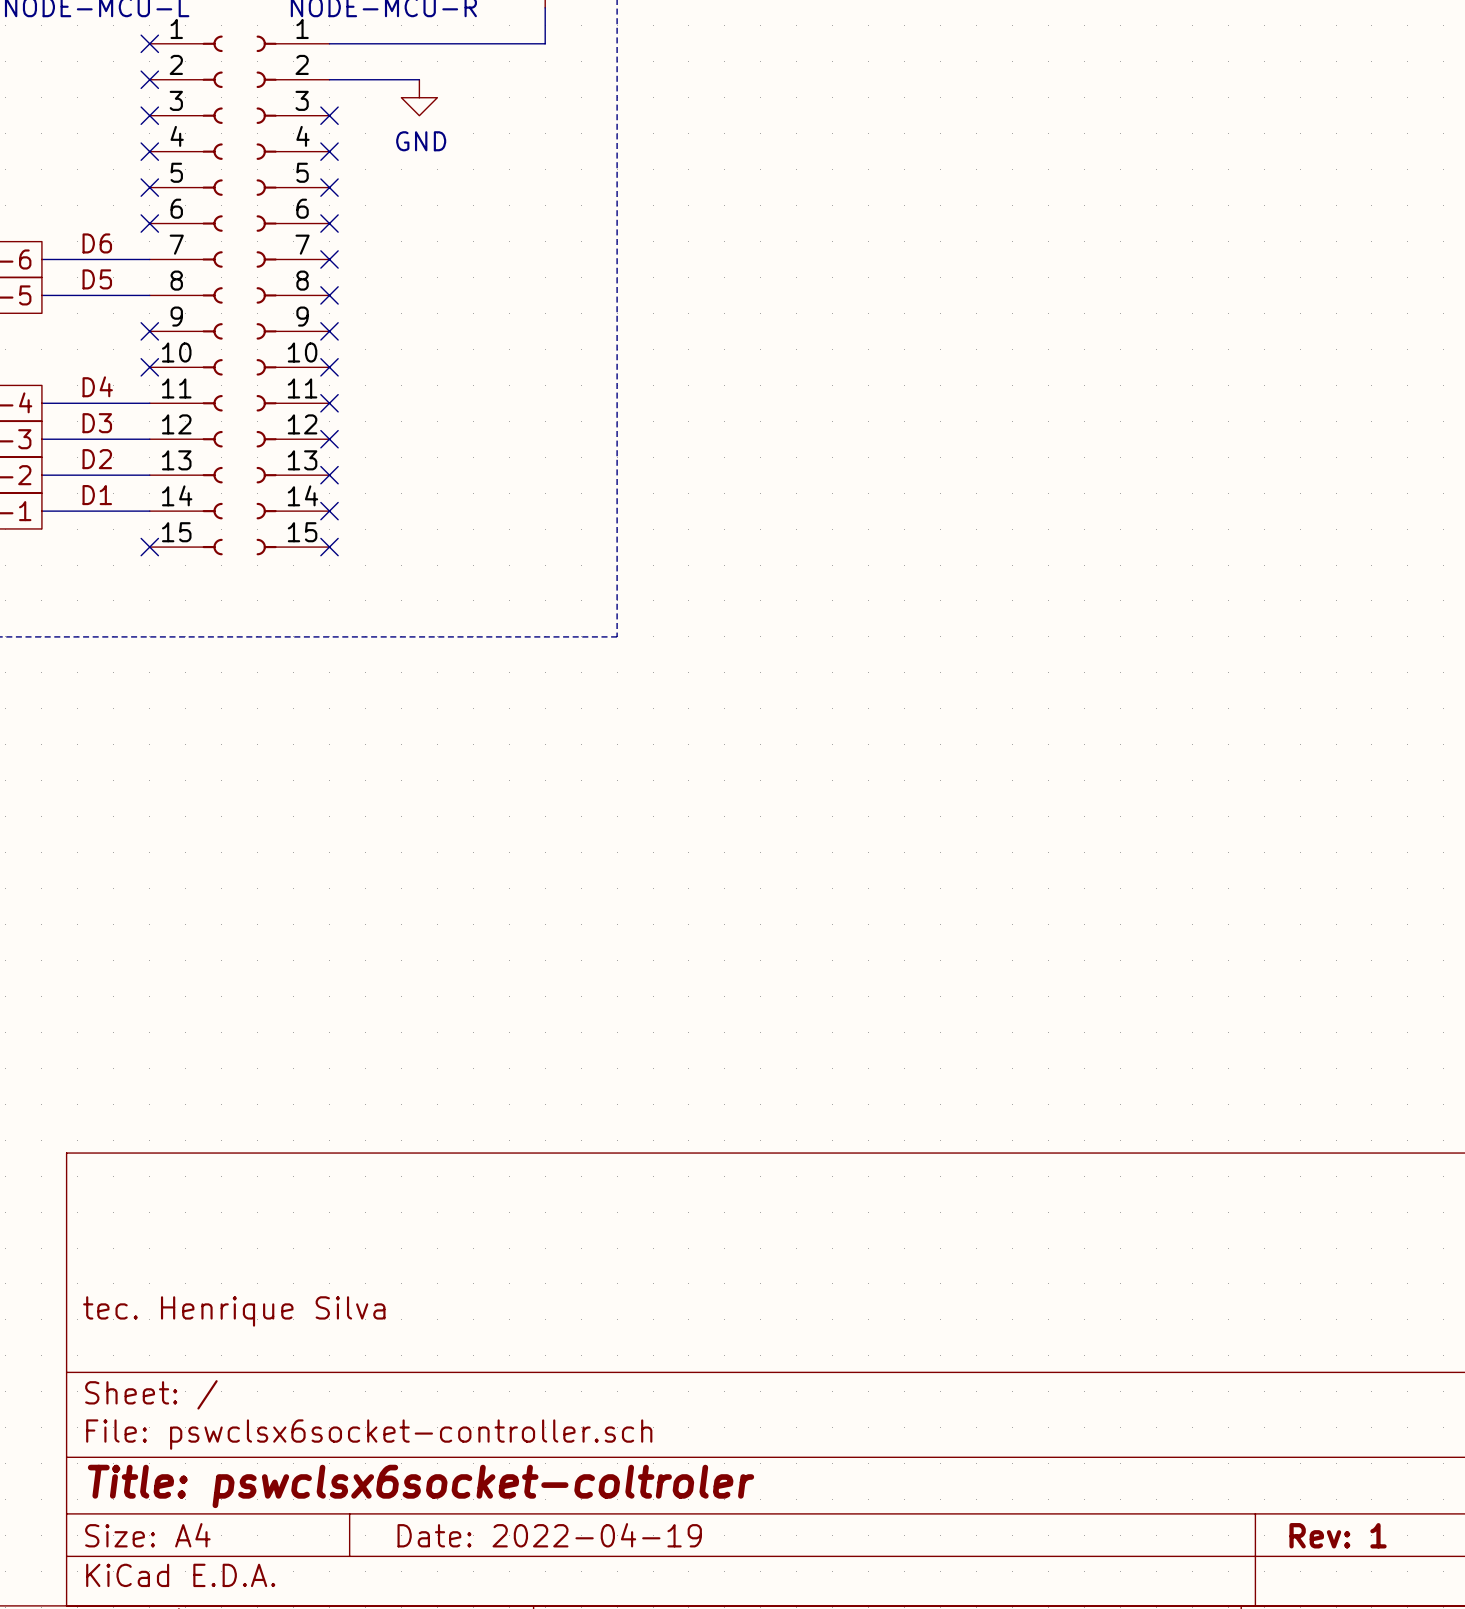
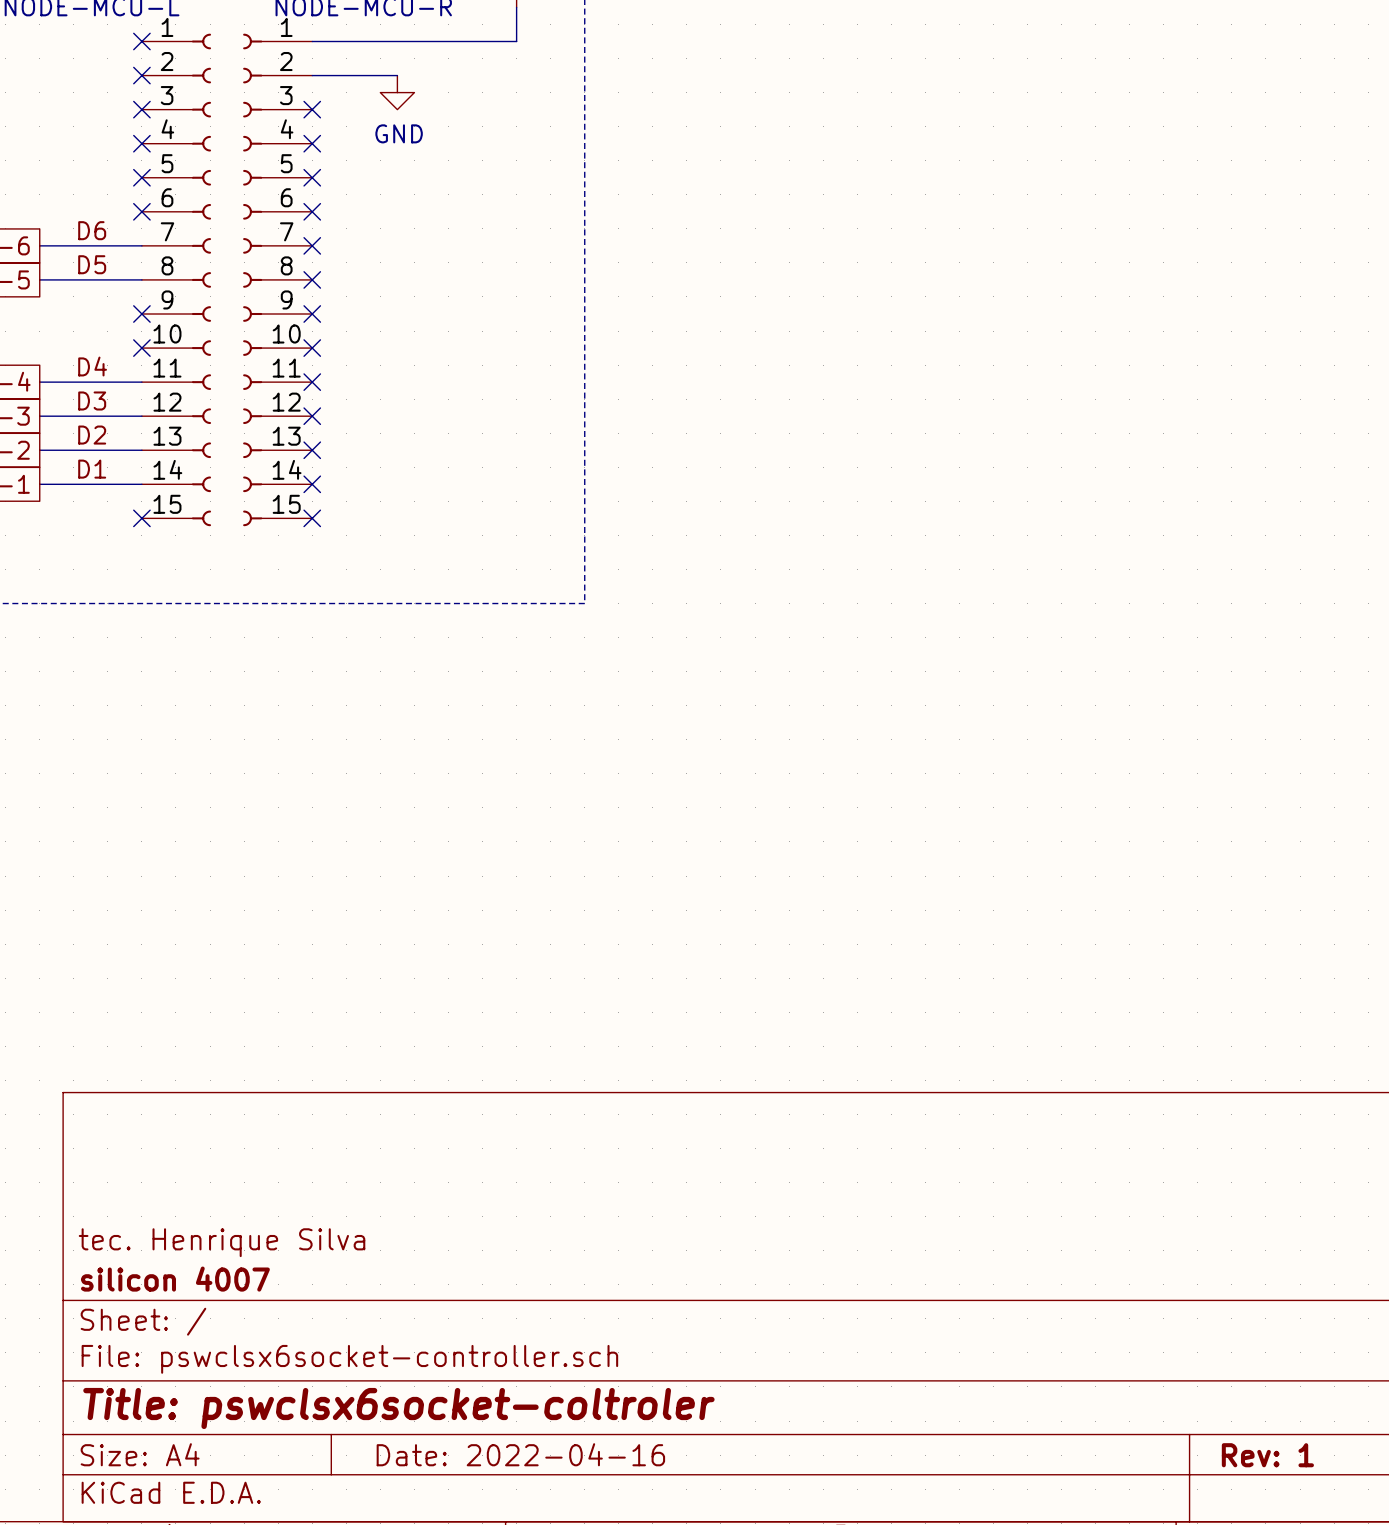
title block: none -> silicon 4007 (175, 1279)
title block: Date: 2022-04-19 (549, 1535) -> Date: 2022-04-16 (520, 1454)

